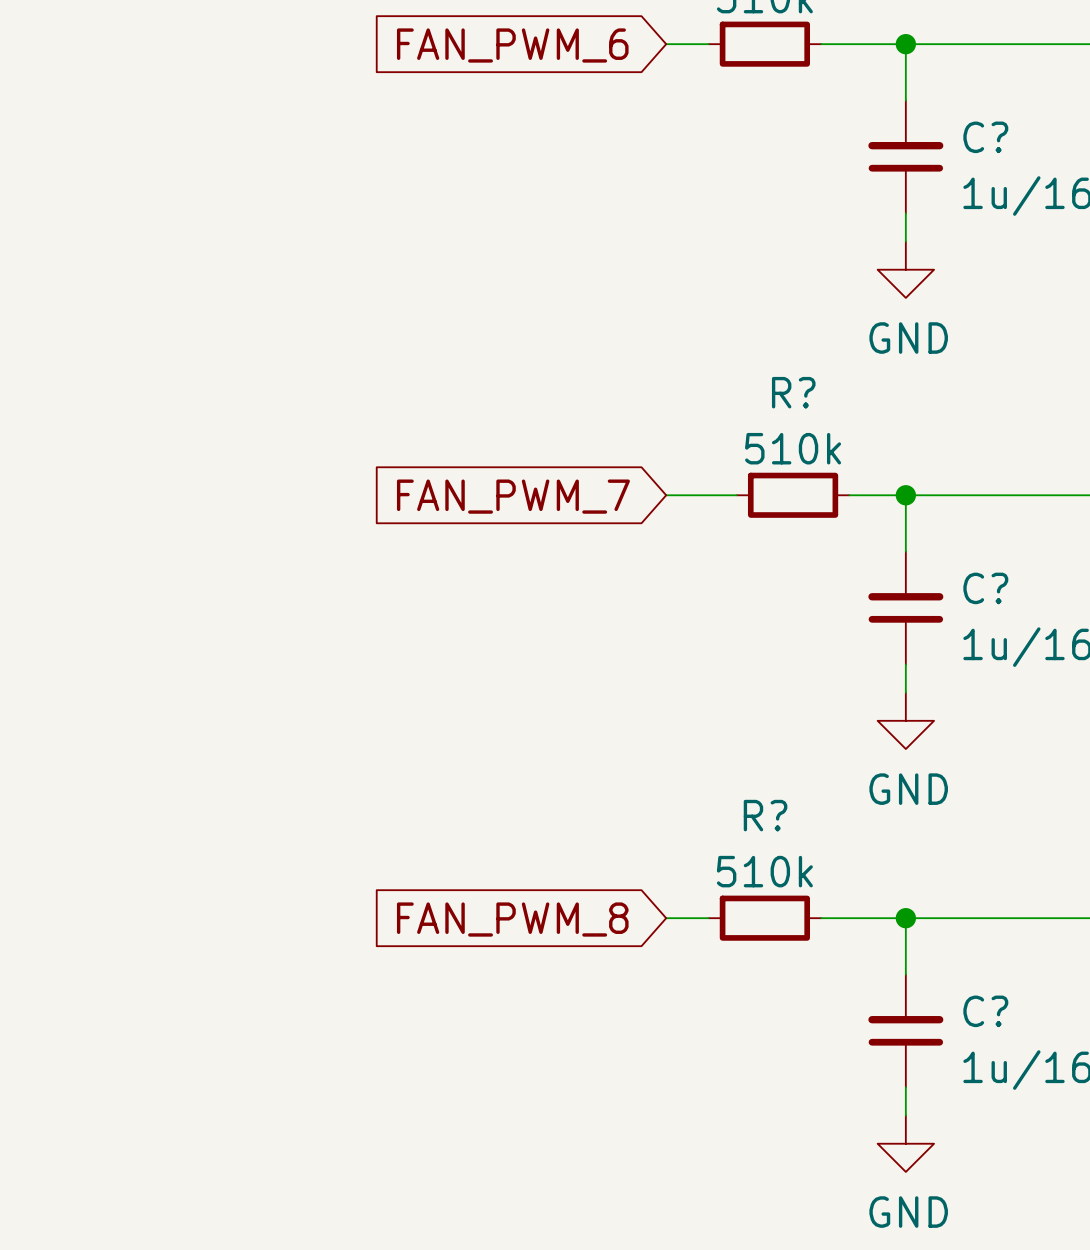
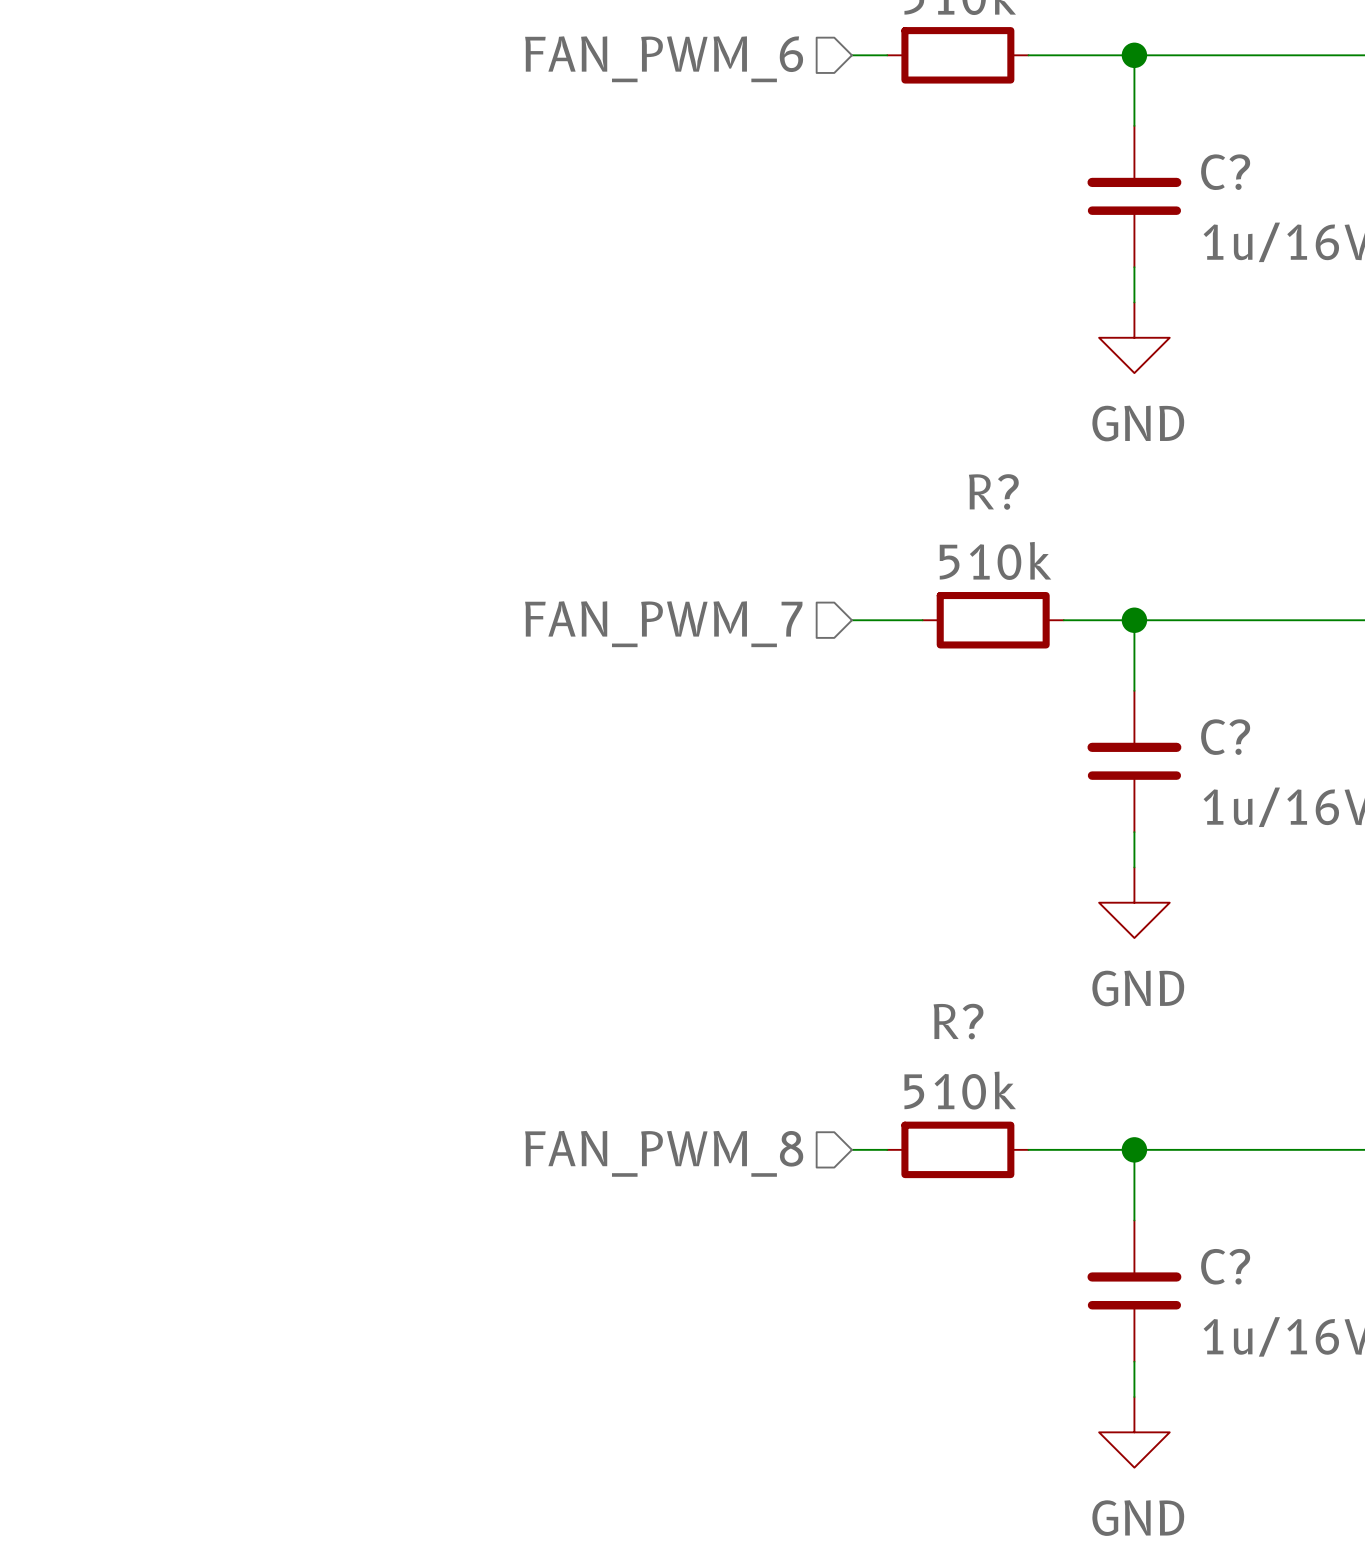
hierarchical label: none -> FAN_PWM_6 (664, 59)
wire: (666, 44) (680, 44) -> none
global label: FAN_PWM_6 (512, 45) -> none
hierarchical label: none -> FAN_PWM_7 (663, 624)
wire: (666, 495) (680, 495) -> none
global label: FAN_PWM_7 (513, 496) -> none
hierarchical label: none -> FAN_PWM_8 (664, 1153)
wire: (666, 918) (680, 918) -> none
global label: FAN_PWM_8 (512, 919) -> none

